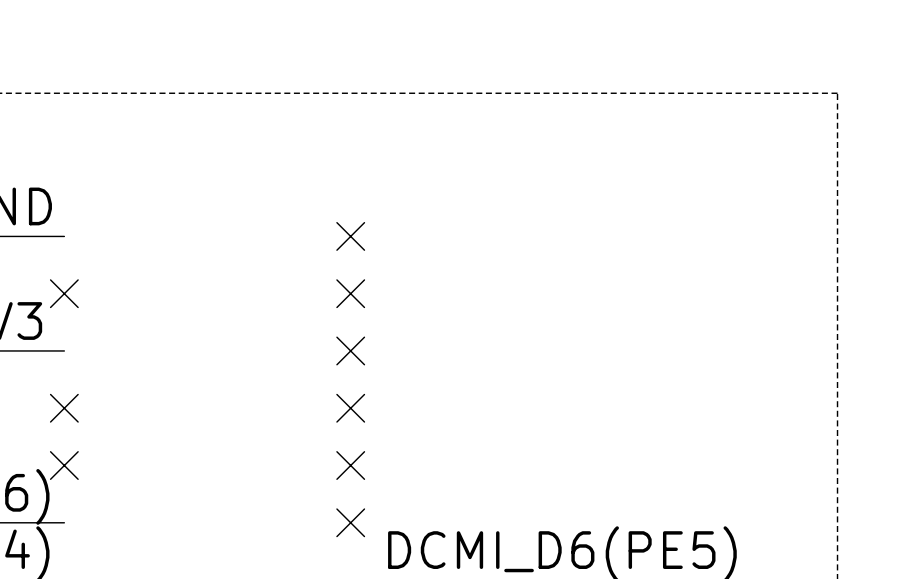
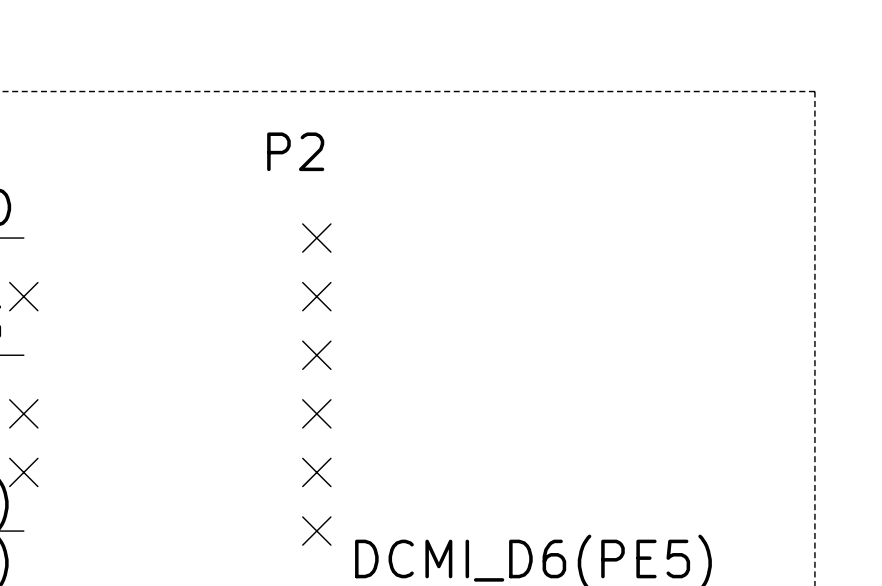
text: none -> P2 (295, 151)

